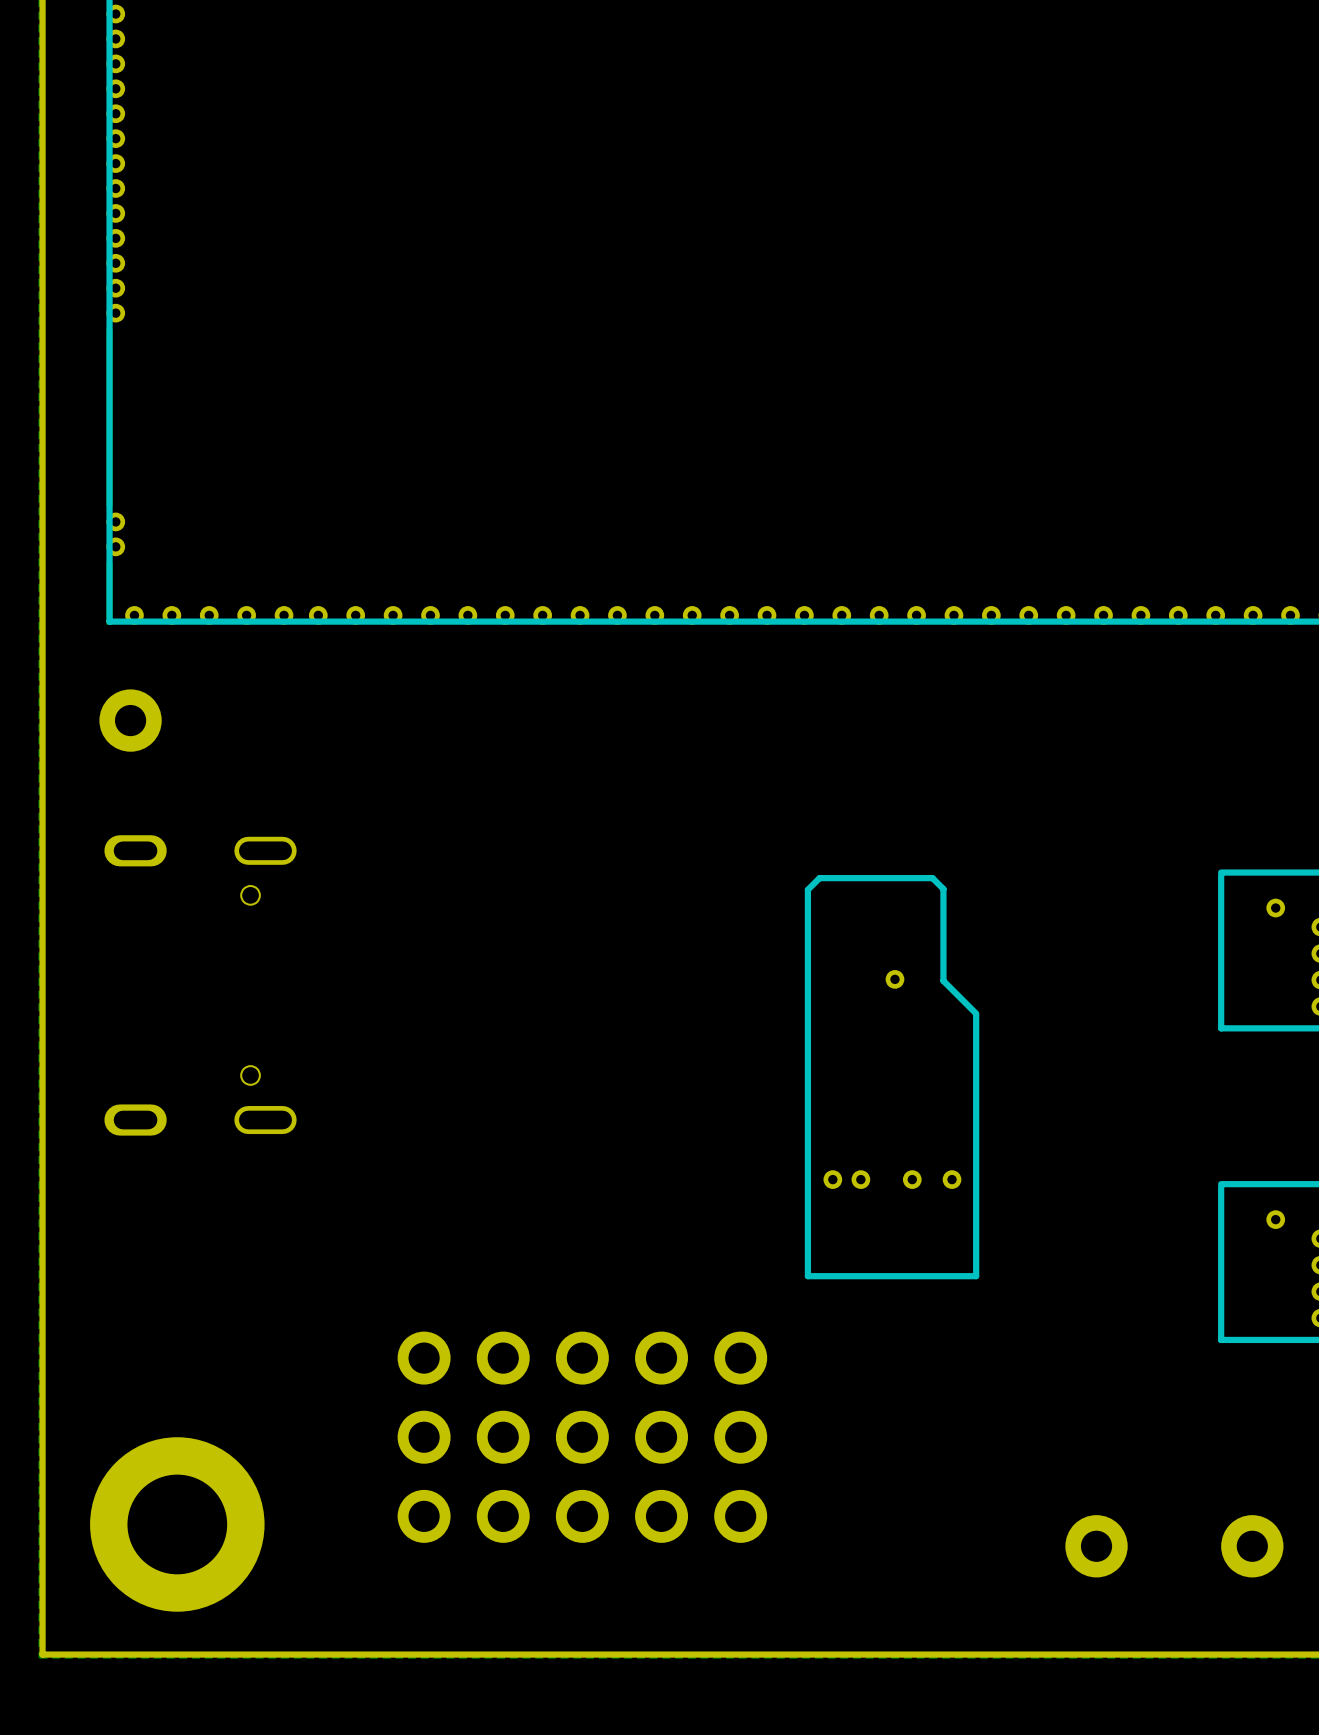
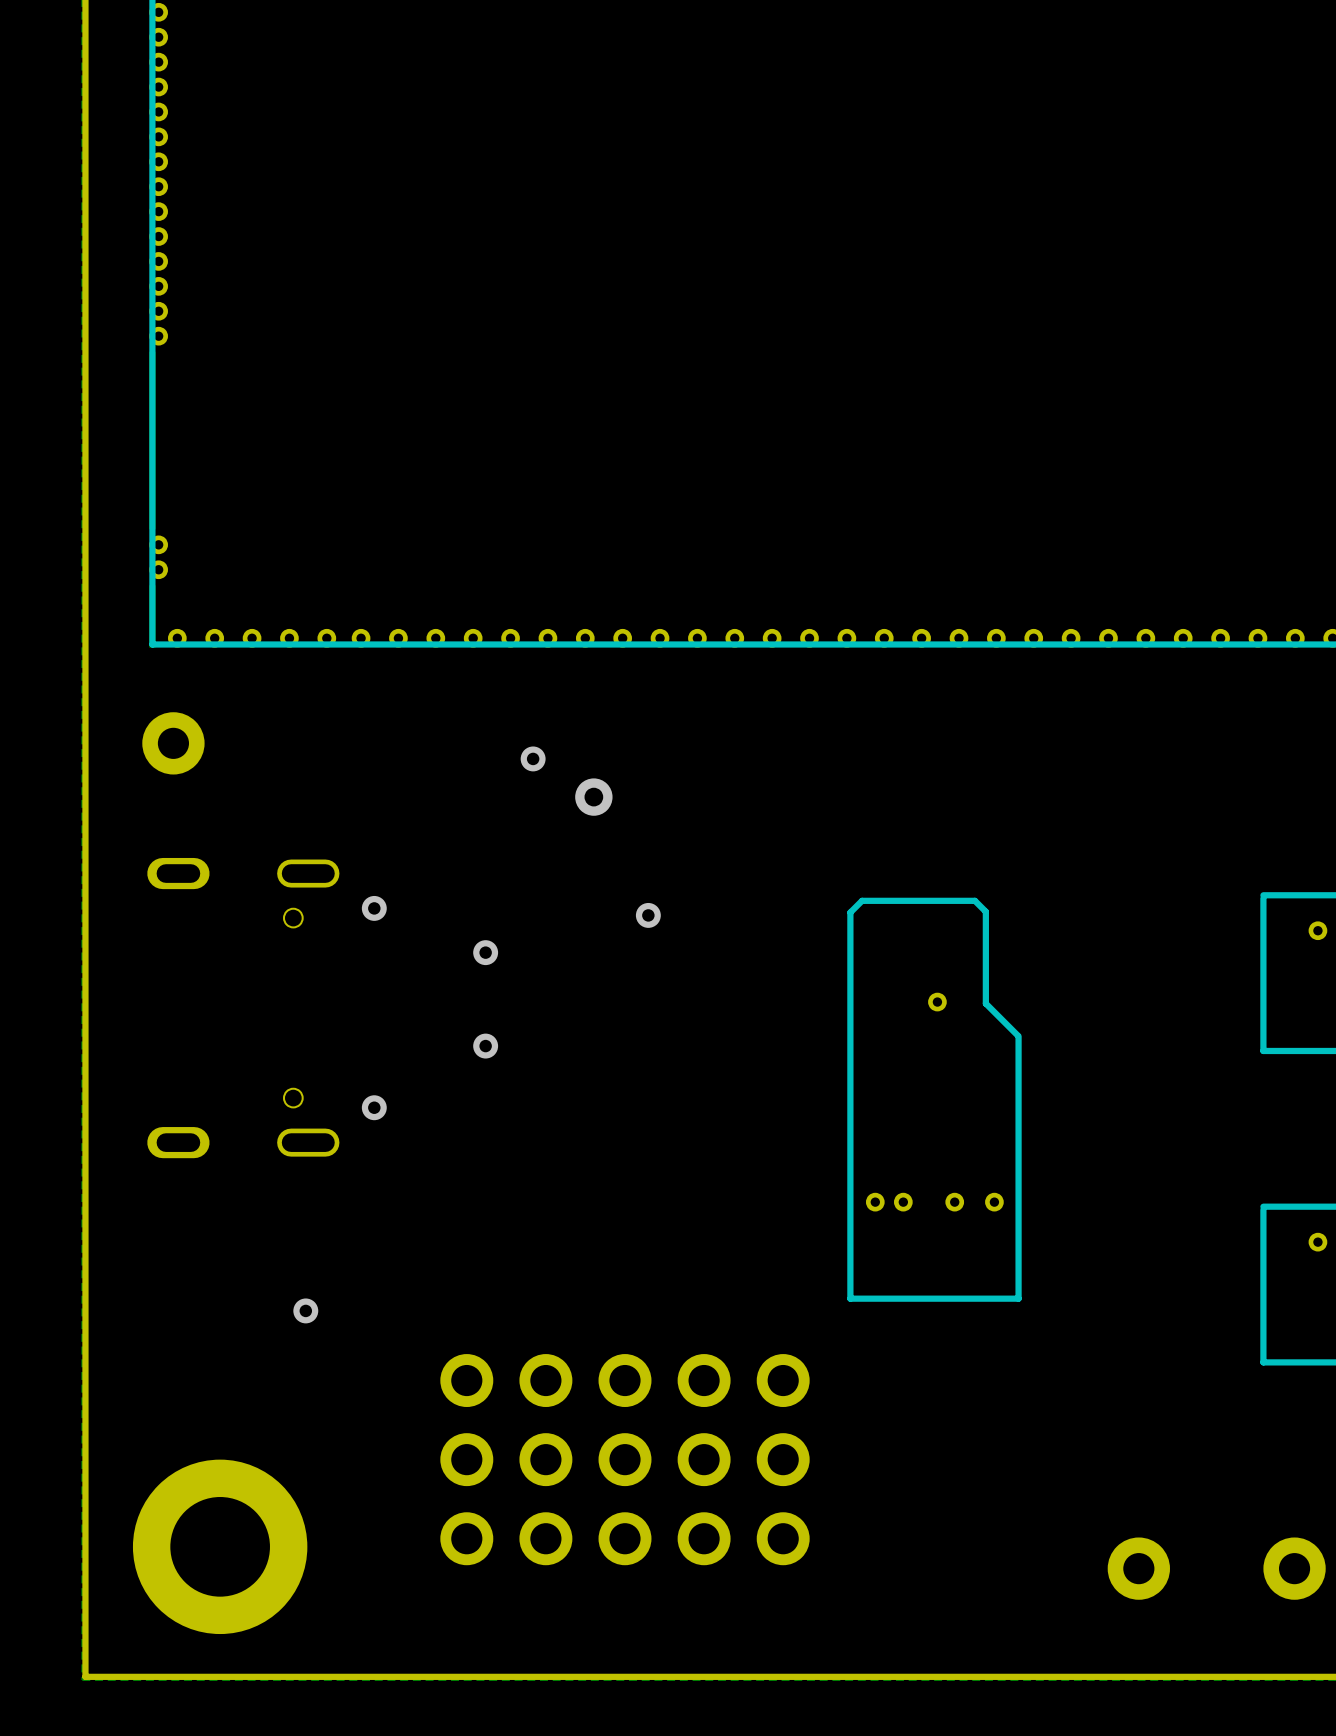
via: none -> (533, 758)
via: none -> (593, 797)
via: none -> (374, 908)
via: none -> (648, 915)
via: none -> (485, 952)
via: none -> (485, 1046)
via: none -> (374, 1107)
via: none -> (305, 1310)

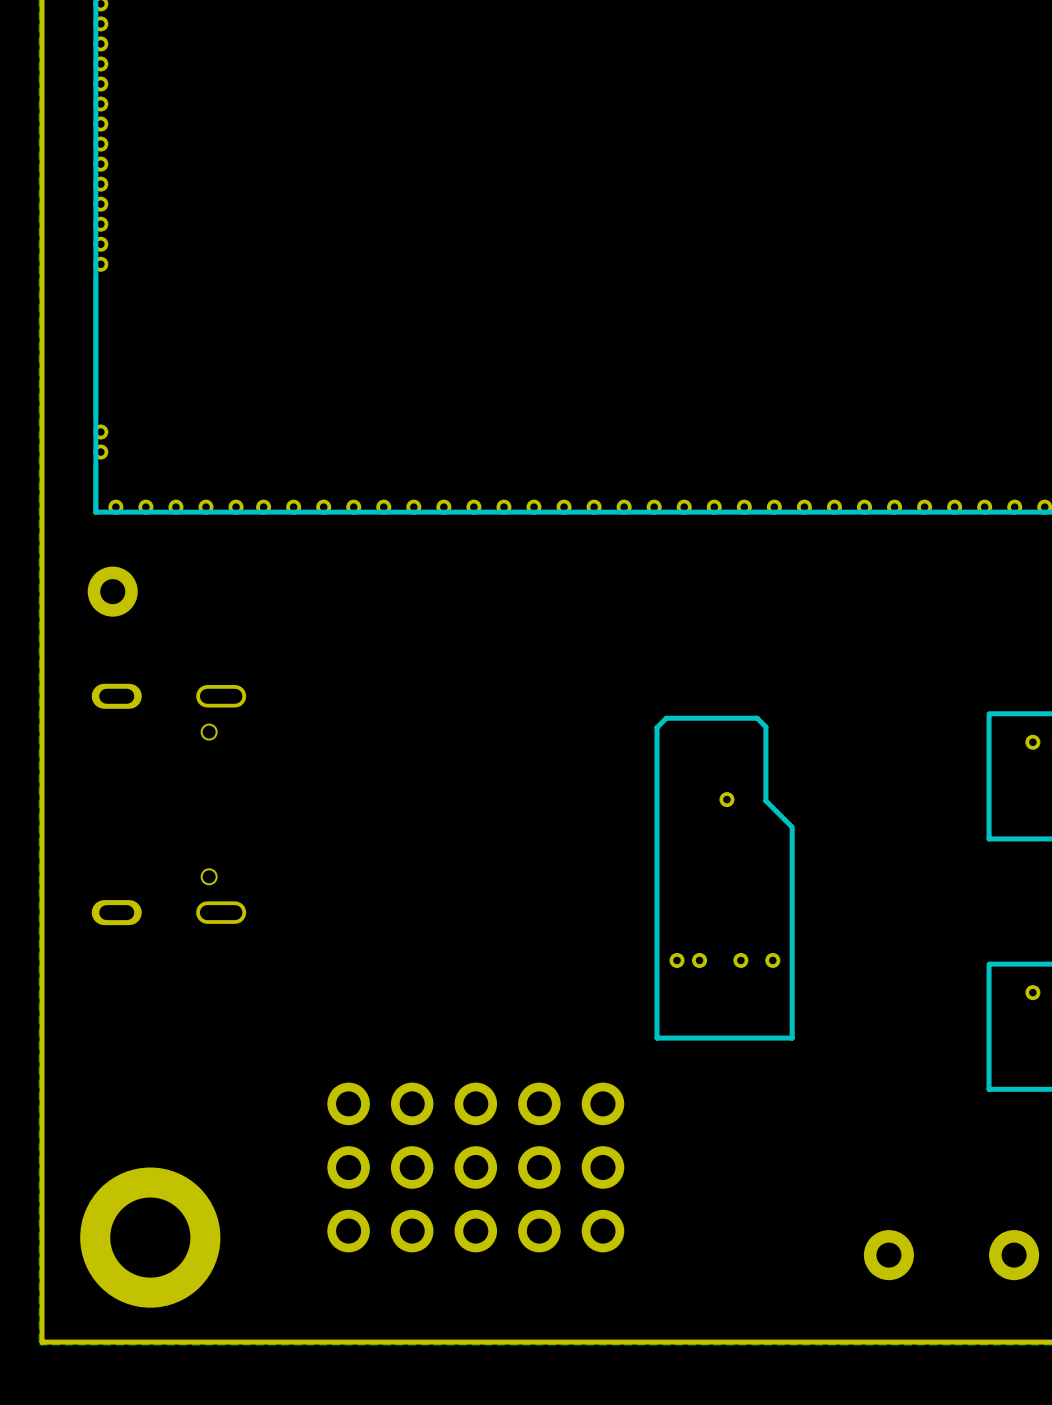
via: (533, 758) -> none
via: (593, 797) -> none
via: (374, 908) -> none
via: (648, 915) -> none
via: (485, 952) -> none
via: (485, 1046) -> none
via: (374, 1107) -> none
via: (305, 1310) -> none

